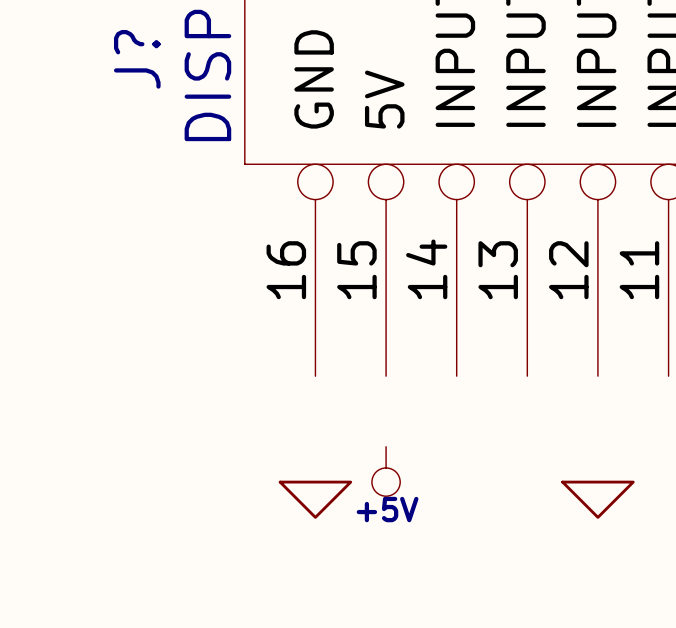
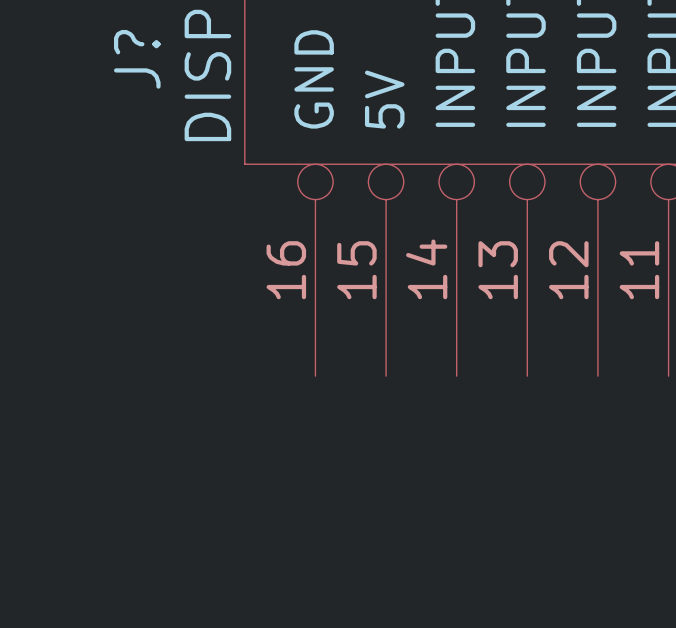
power symbol: +5V (386, 471) -> none
power symbol: (315, 499) -> none
power symbol: (597, 499) -> none

